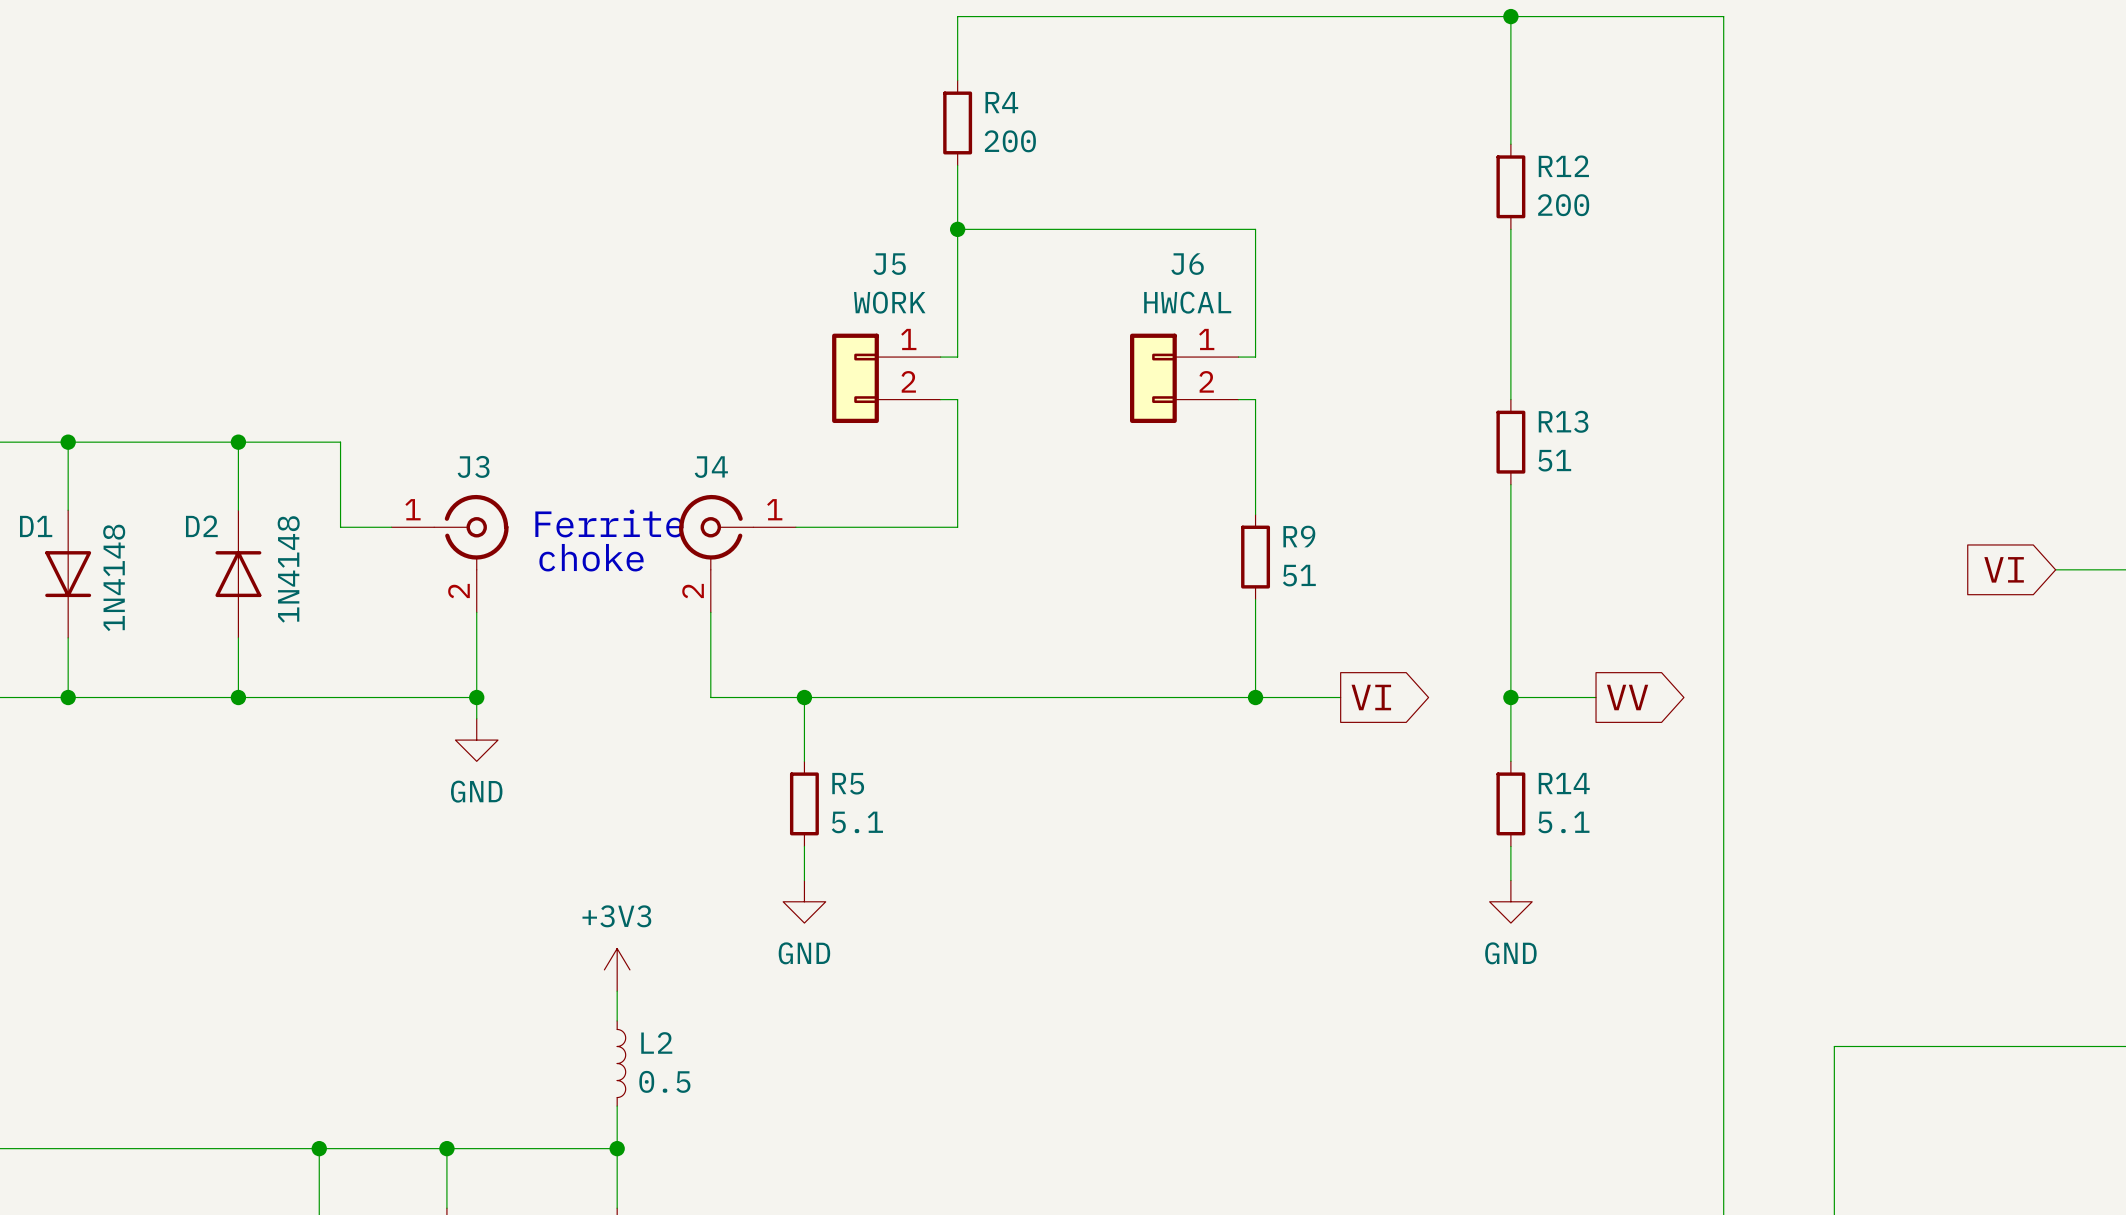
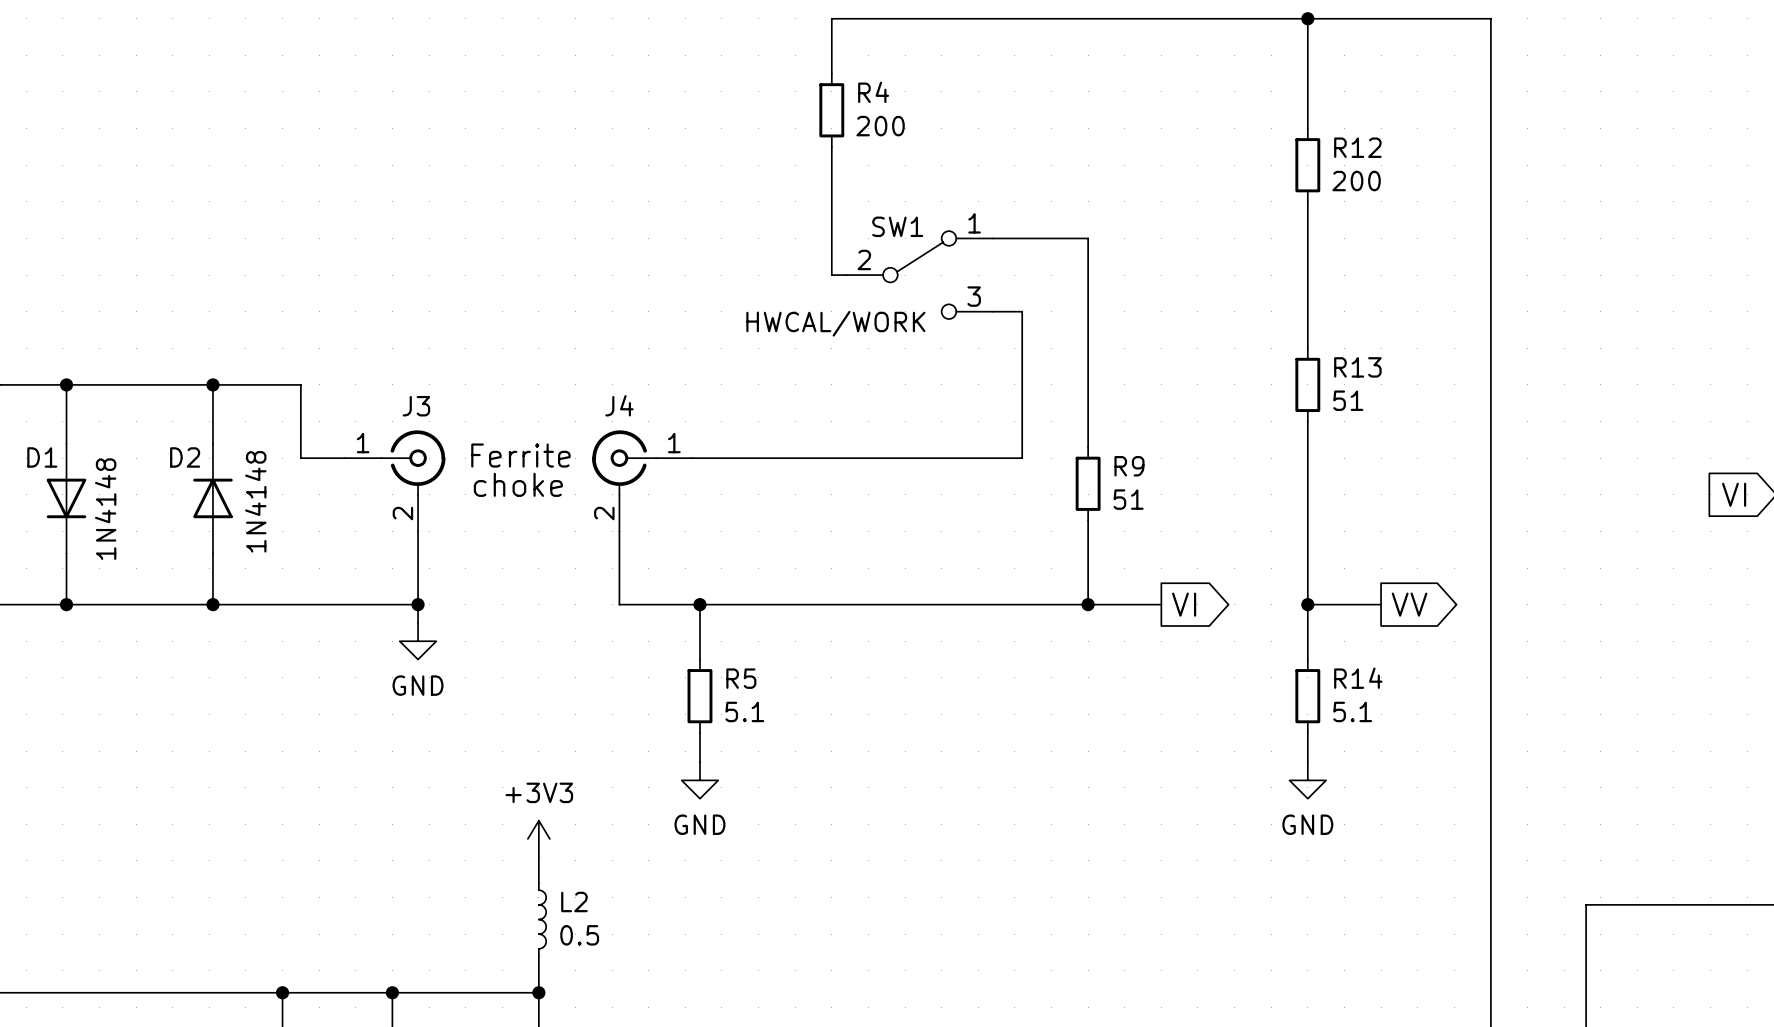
wire: (957, 229) (1255, 229) (1255, 271) -> (992, 238) (1088, 238)
junction: (957, 229) -> none
wire: (957, 314) (957, 357) (940, 357) -> (831, 275) (846, 275)
SW1: none -> HWCAL/WORK (919, 275)
wire: (1238, 357) (1255, 357) -> (1088, 348) (1088, 311)
J5: WORK (886, 378) -> none
J6: HWCAL (1184, 378) -> none
wire: (940, 399) (957, 399) (957, 527) -> (992, 311) (1022, 311) (1022, 458) (831, 458)
wire: (1238, 399) (1255, 399) -> none

